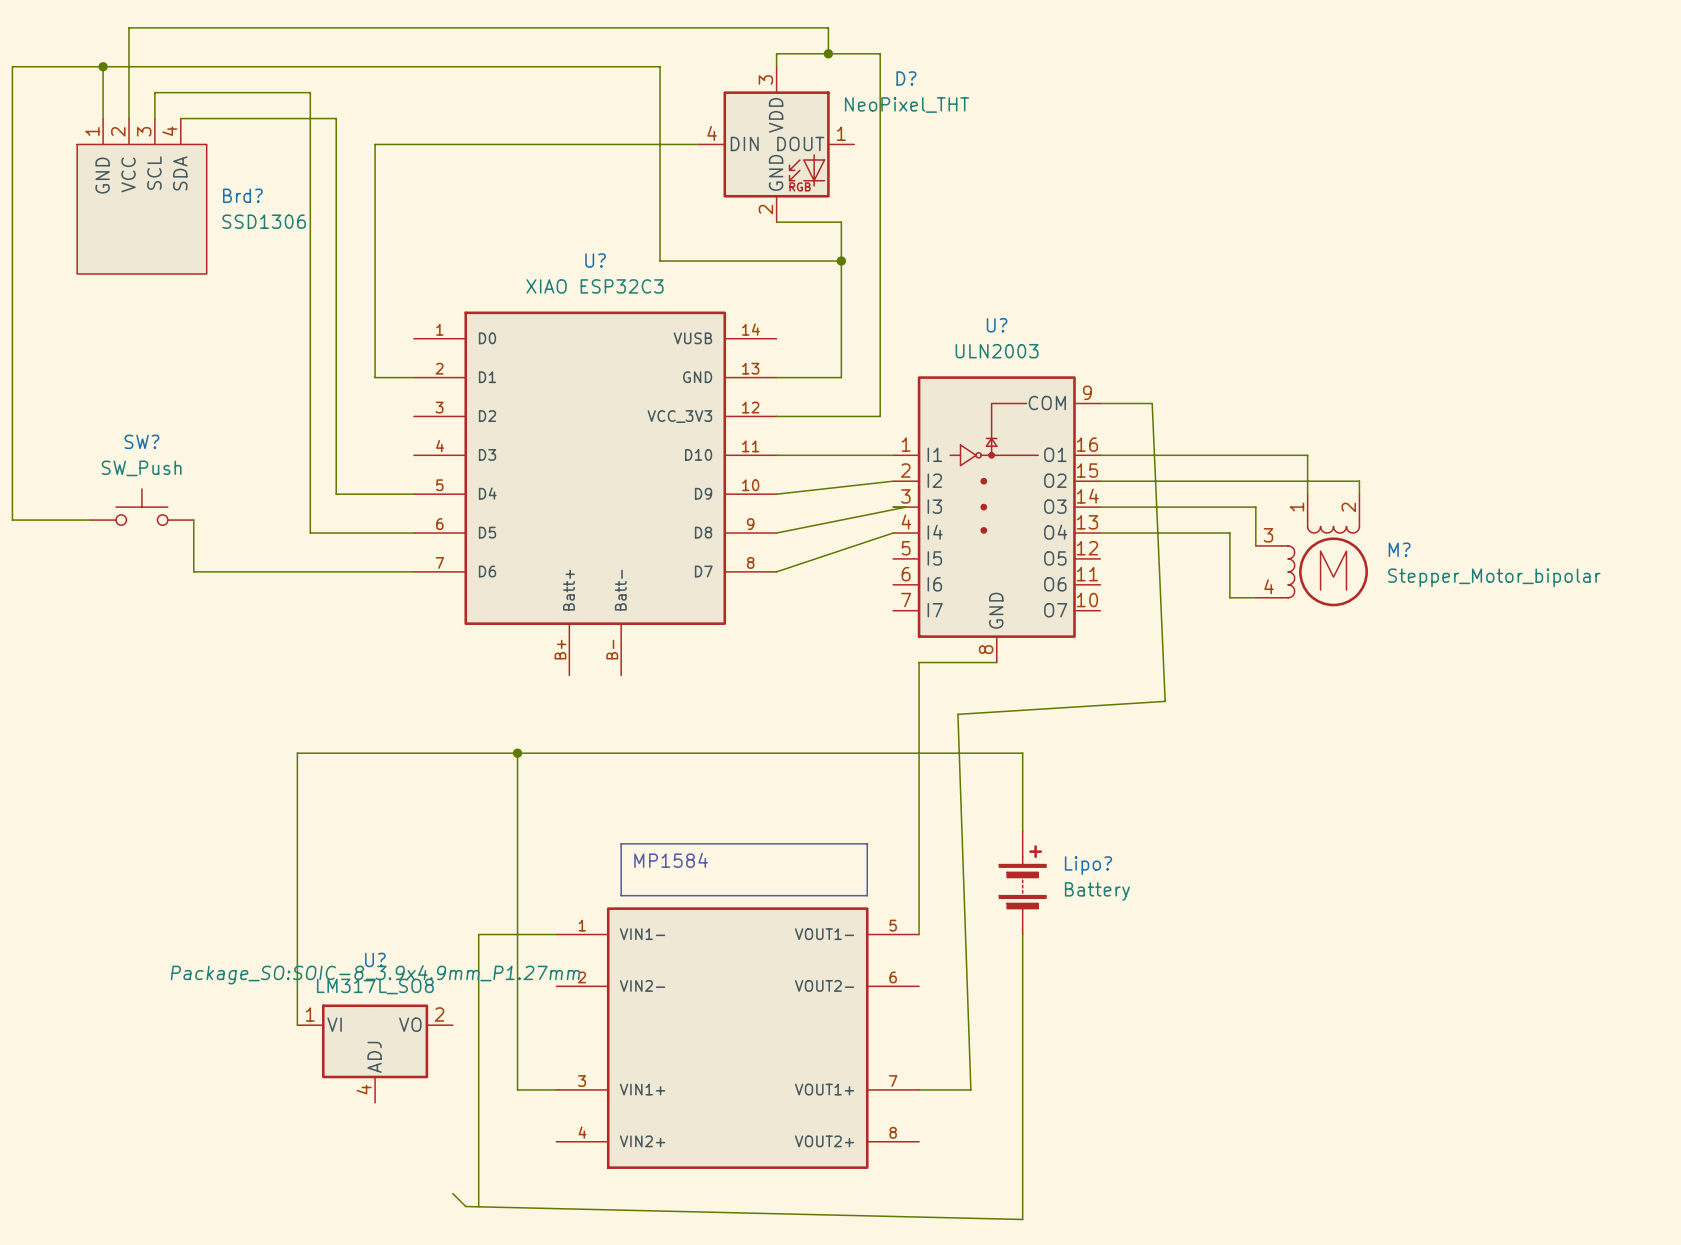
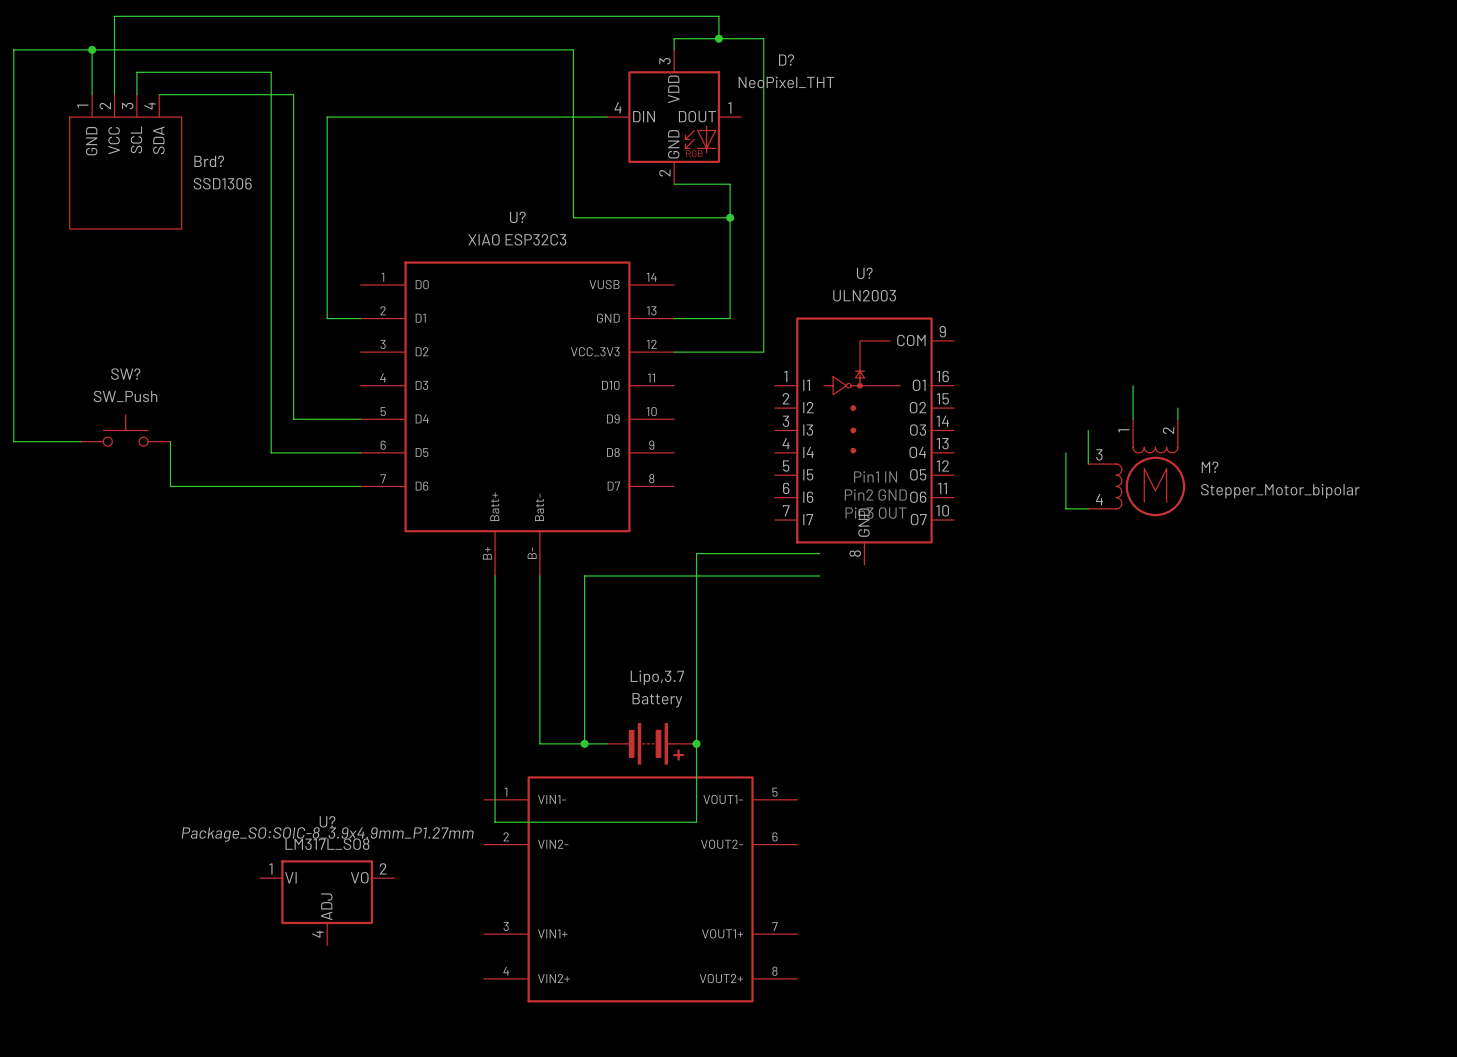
wire: (1100, 403) (1152, 403) (1165, 701) (957, 714) (970, 1089) (919, 1089) -> none
wire: (776, 455) (893, 455) -> none
wire: (1100, 455) (1307, 455) -> none
wire: (893, 481) (776, 494) -> none
wire: (1100, 481) (1359, 481) -> none
wire: (893, 507) (906, 507) (776, 533) -> none
wire: (1100, 507) (1255, 507) -> none
wire: (893, 533) (776, 571) -> none
wire: (1100, 533) (1229, 533) -> none
text: none -> Pin1 IN (875, 476)
text: none -> Pin2 GND (875, 494)
text: none -> Pin3 OUT (875, 513)
wire: none -> (819, 553) (696, 553) (696, 822) (495, 822) (495, 575)
wire: (996, 662) (919, 662) (919, 934) -> none
wire: none -> (539, 575) (539, 743) (607, 743)
wire: none -> (819, 575) (584, 575) (584, 743)
wire: (517, 753) (517, 1089) (556, 1089) -> none
junction: (517, 753) -> none
wire: (1022, 830) (1022, 753) (297, 753) (297, 1025) -> none
line: (621, 843) (867, 843) (867, 895) (621, 895) (621, 843) -> none
text: MP1584 (671, 860) -> none
junction: none -> (584, 743)
Lipo,3.7: none -> Battery (651, 743)
junction: none -> (696, 743)
Lipo?: Battery (1022, 882) -> none
wire: (556, 934) (478, 934) (478, 1206) -> none
wire: (1022, 934) (1022, 1219) (465, 1206) (452, 1193) -> none

